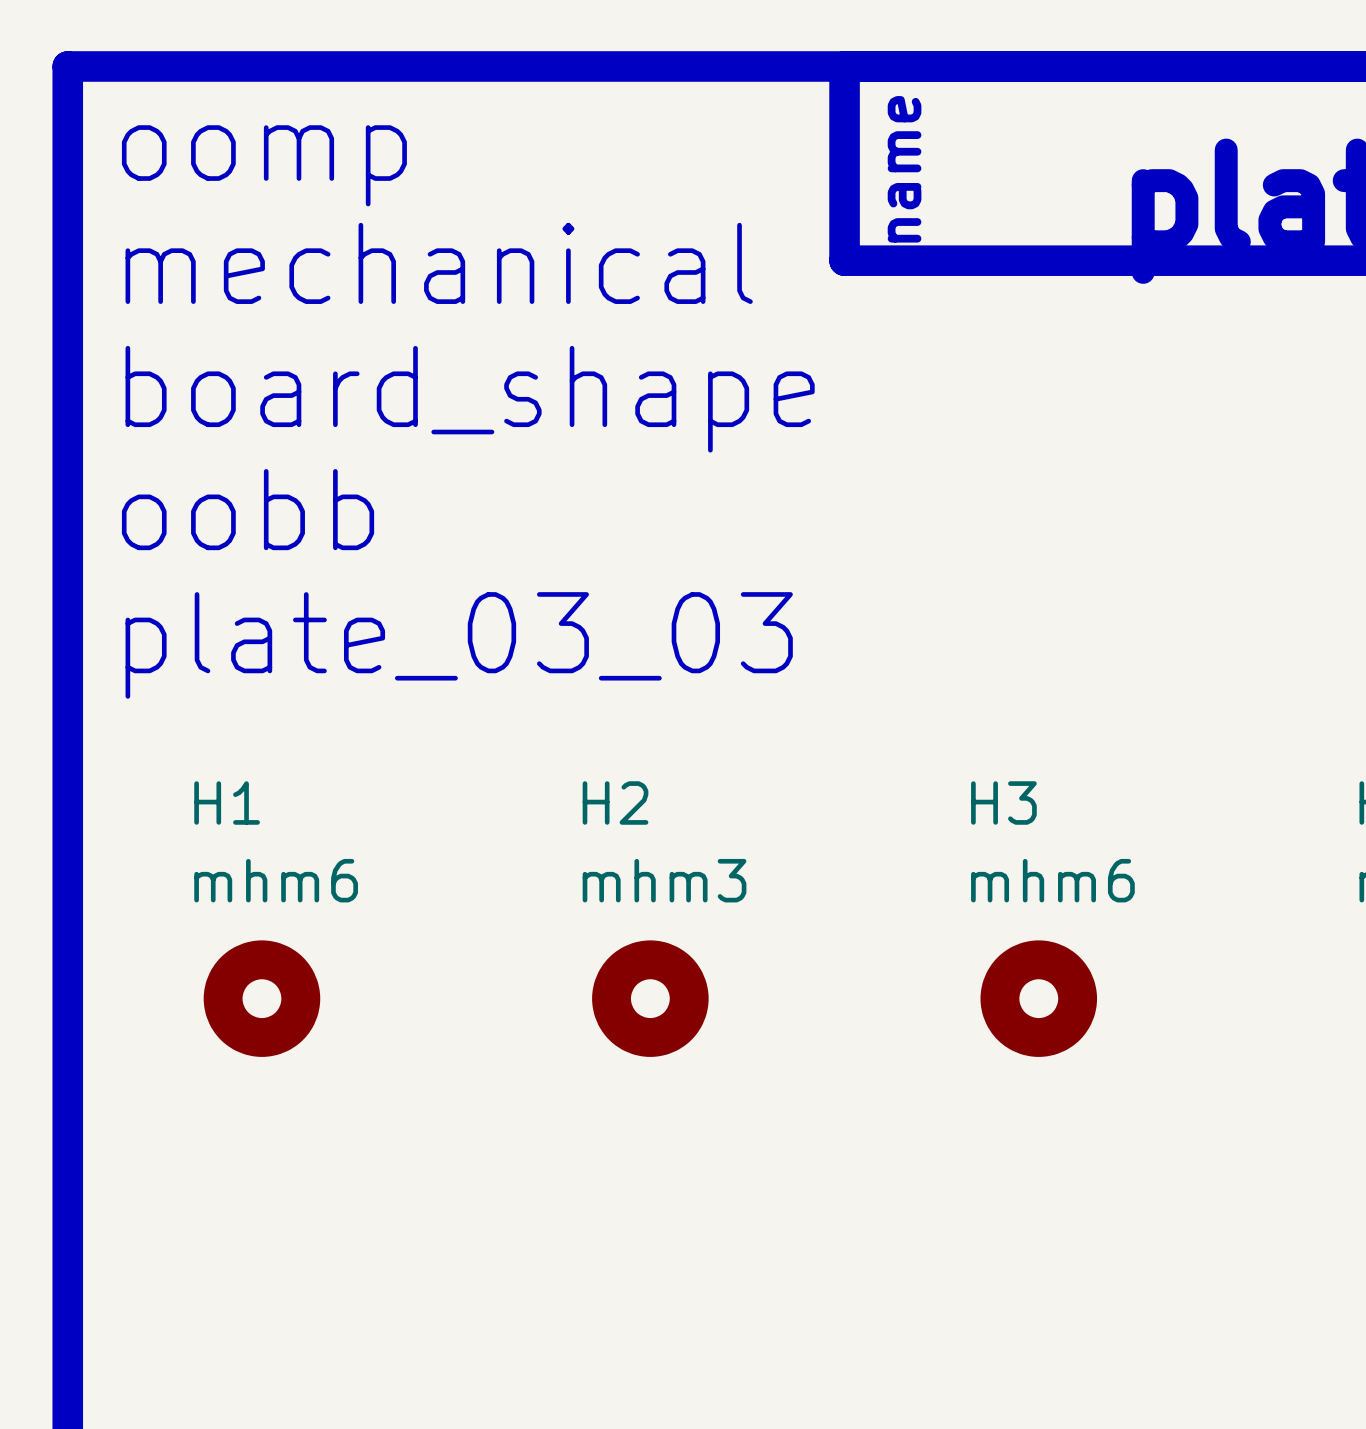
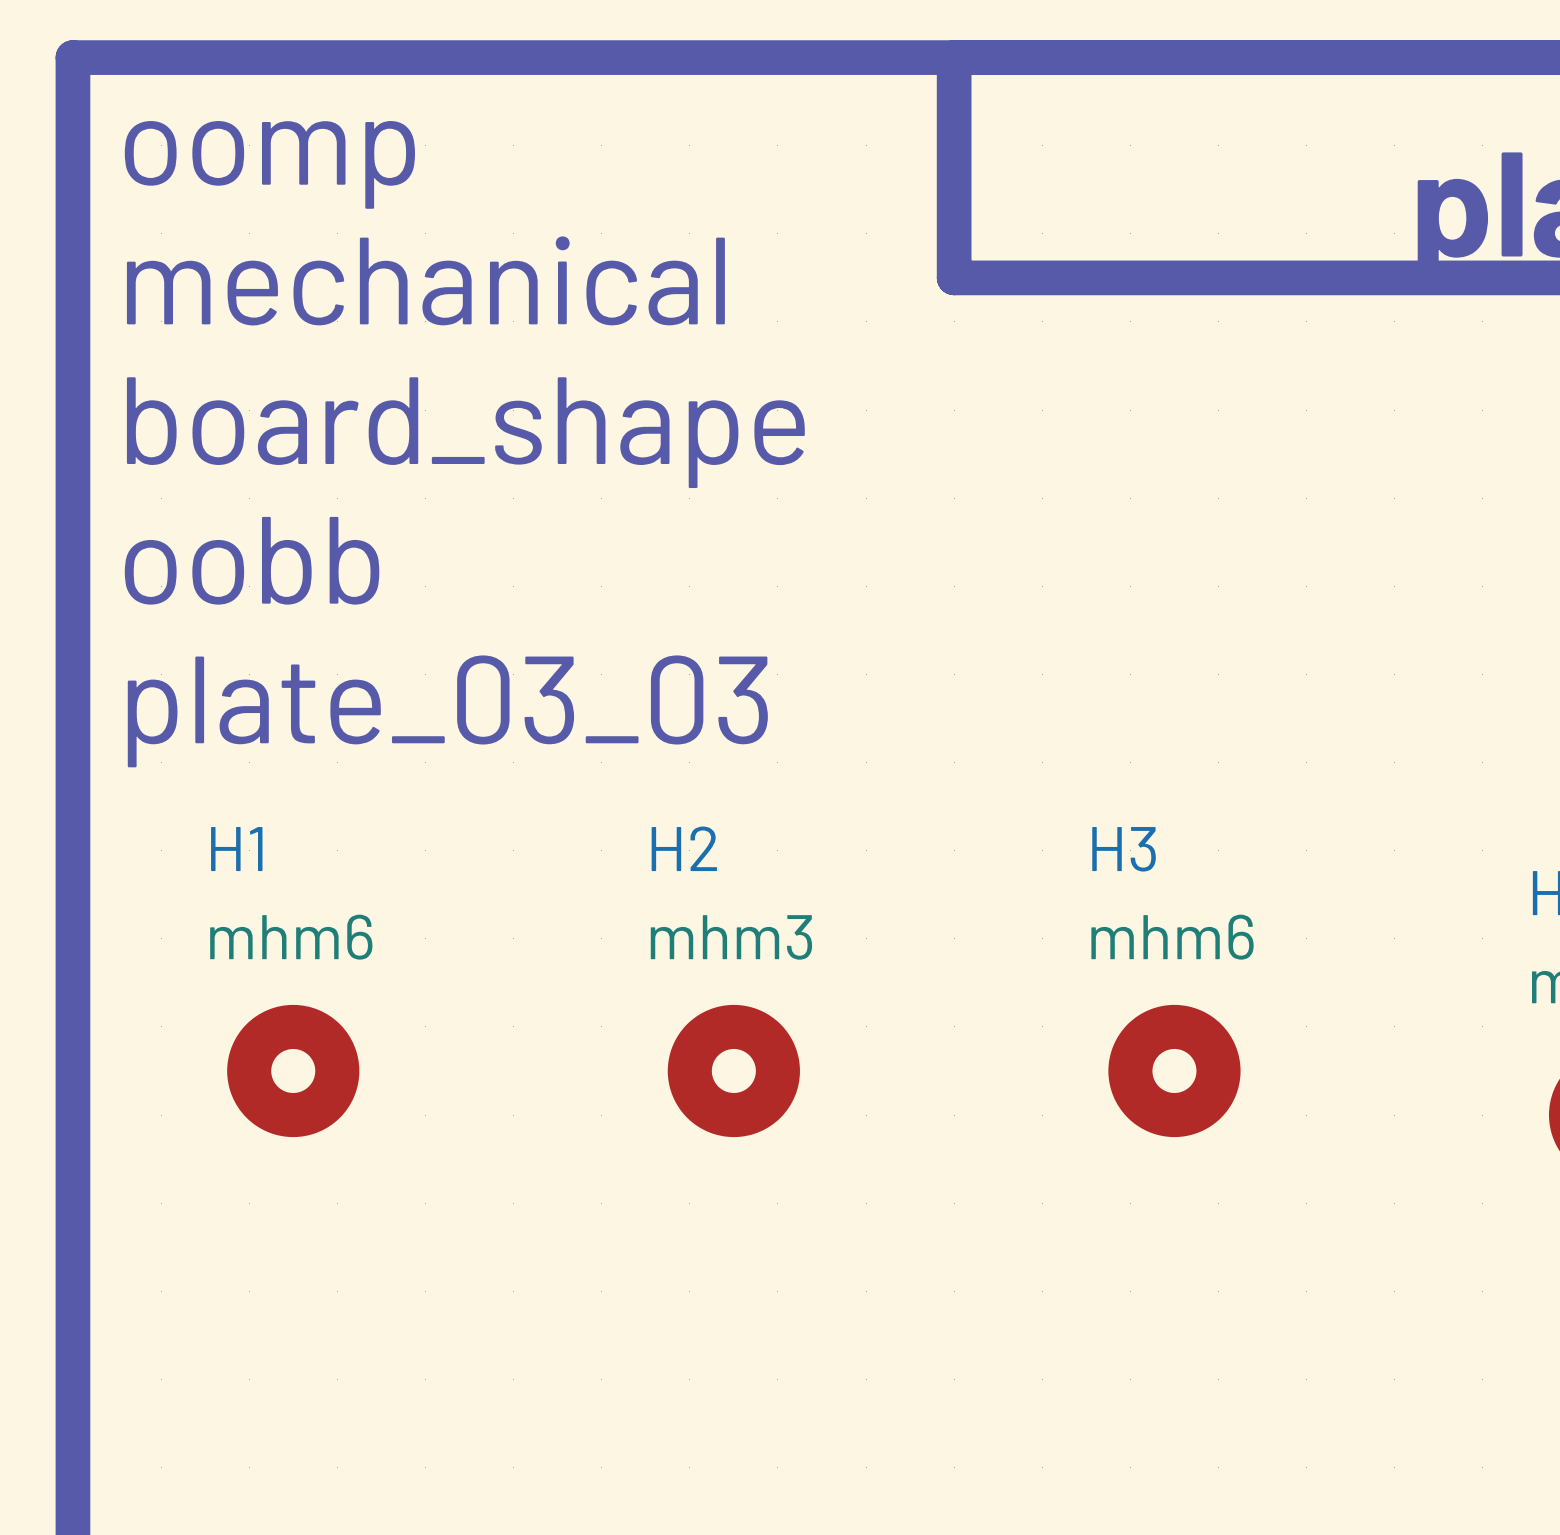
text: name (904, 169) -> none
H1 position: (261, 998) -> (293, 1070)
H2 position: (650, 998) -> (733, 1070)
H3 position: (1038, 998) -> (1174, 1070)

